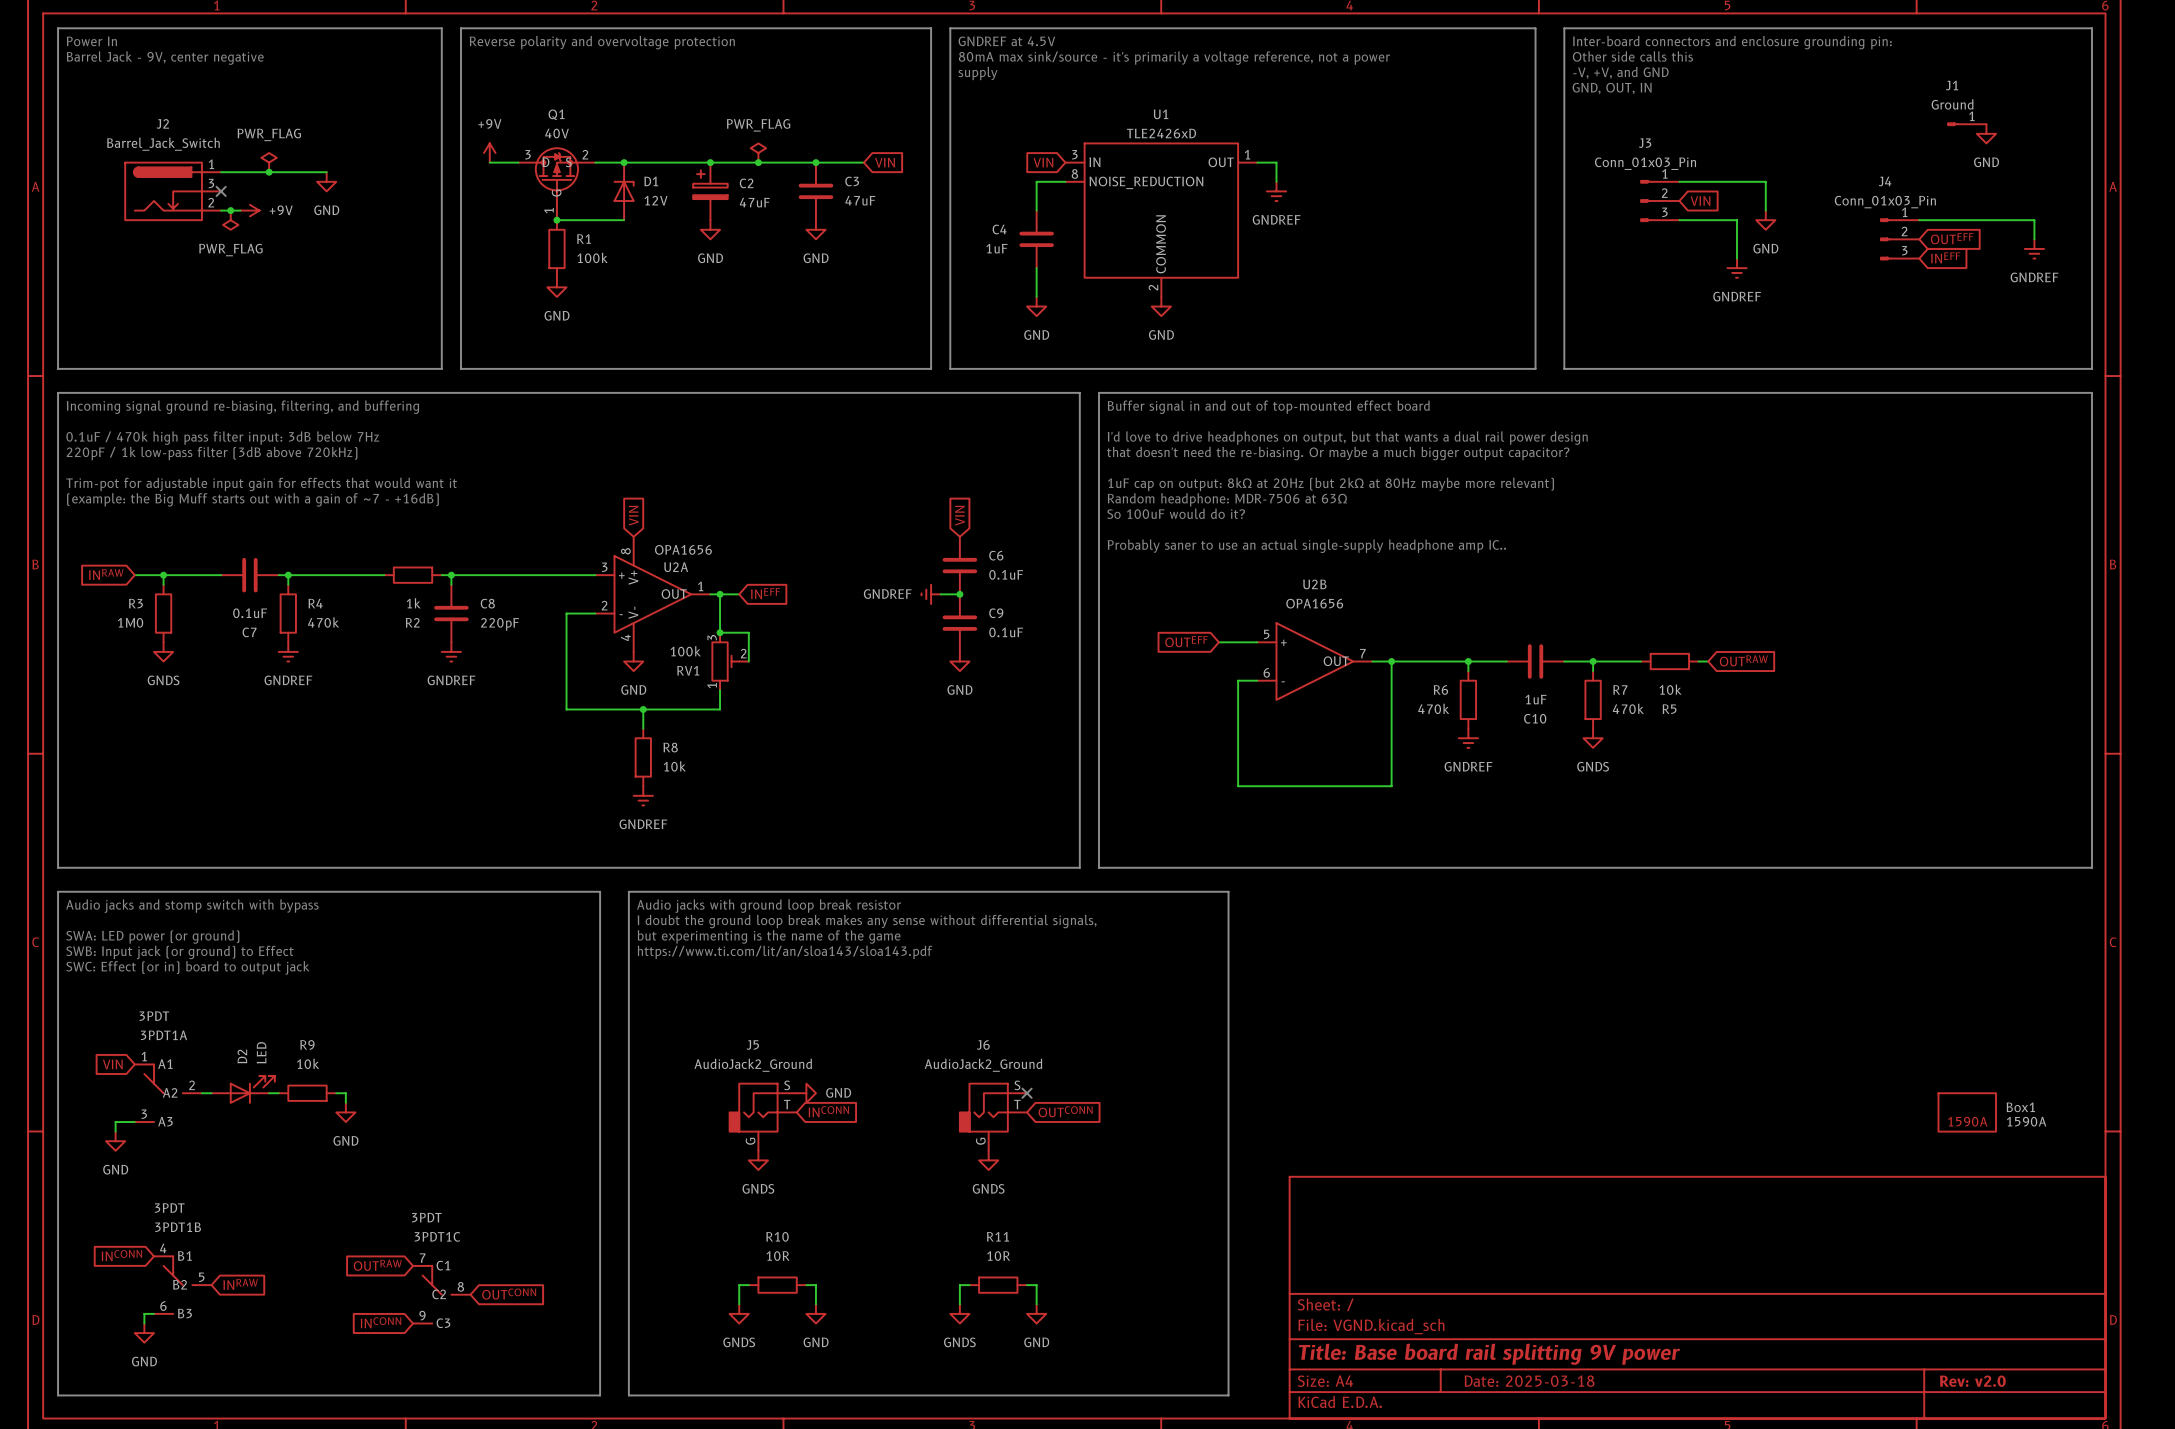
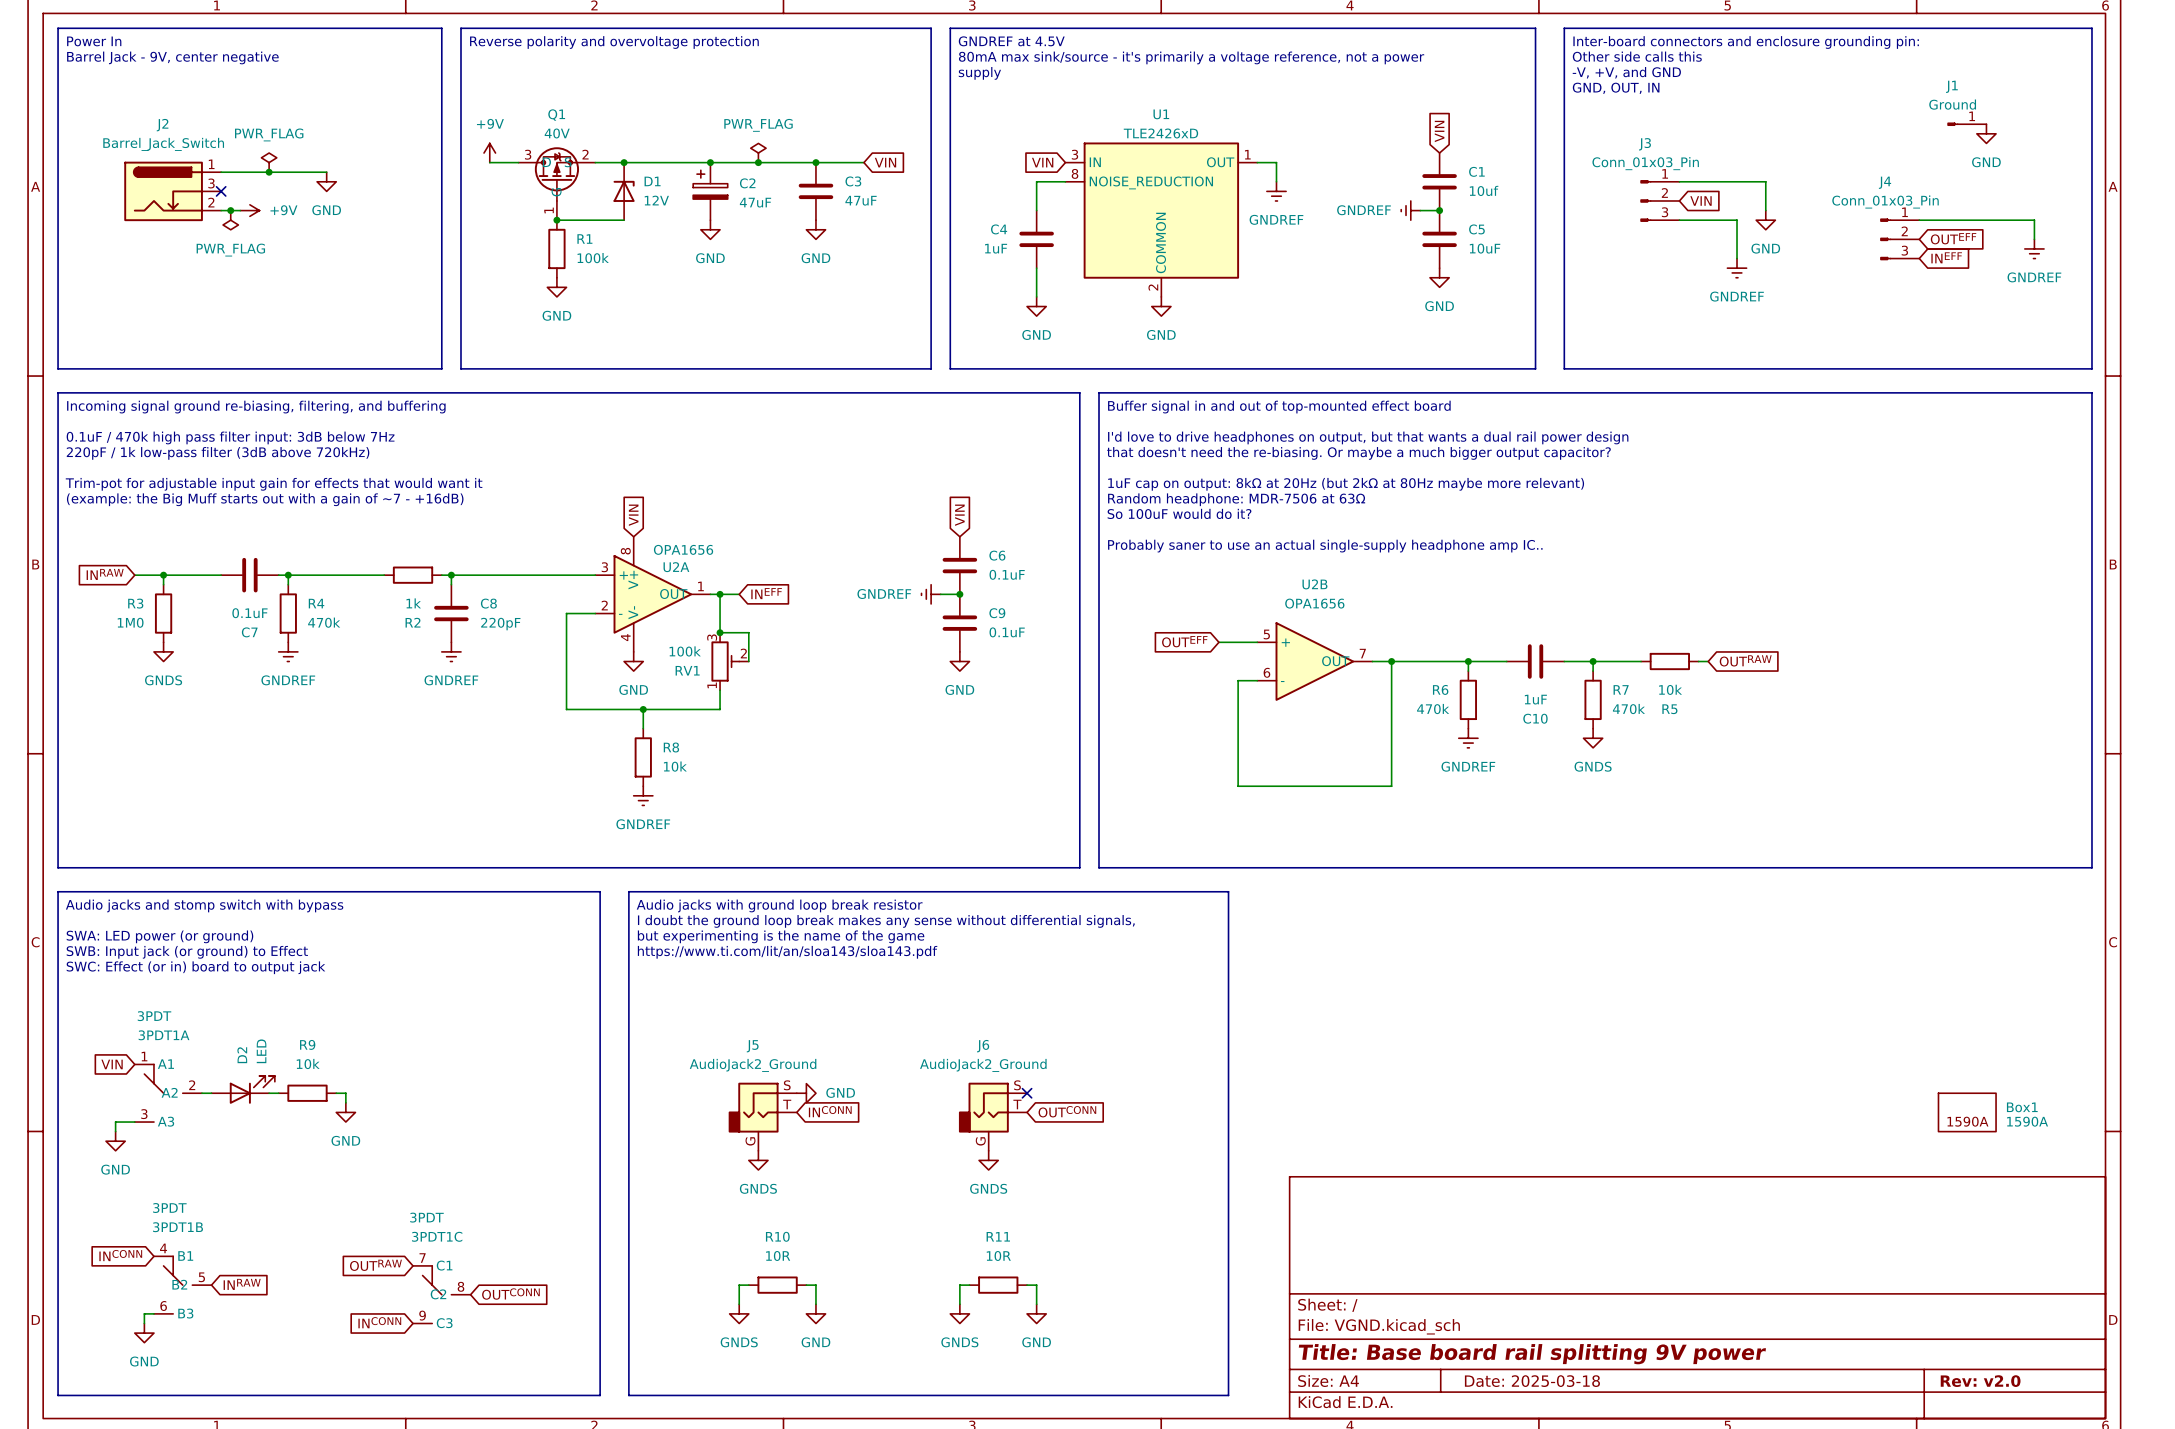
global label: none -> VIN (1439, 131)
C1: none -> 10uf (1439, 181)
power symbol: none -> GNDREF (1410, 210)
wire: none -> (1420, 210) (1439, 210)
junction: none -> (1439, 210)
C5: none -> 10uF (1439, 239)
power symbol: none -> GND (1439, 277)

